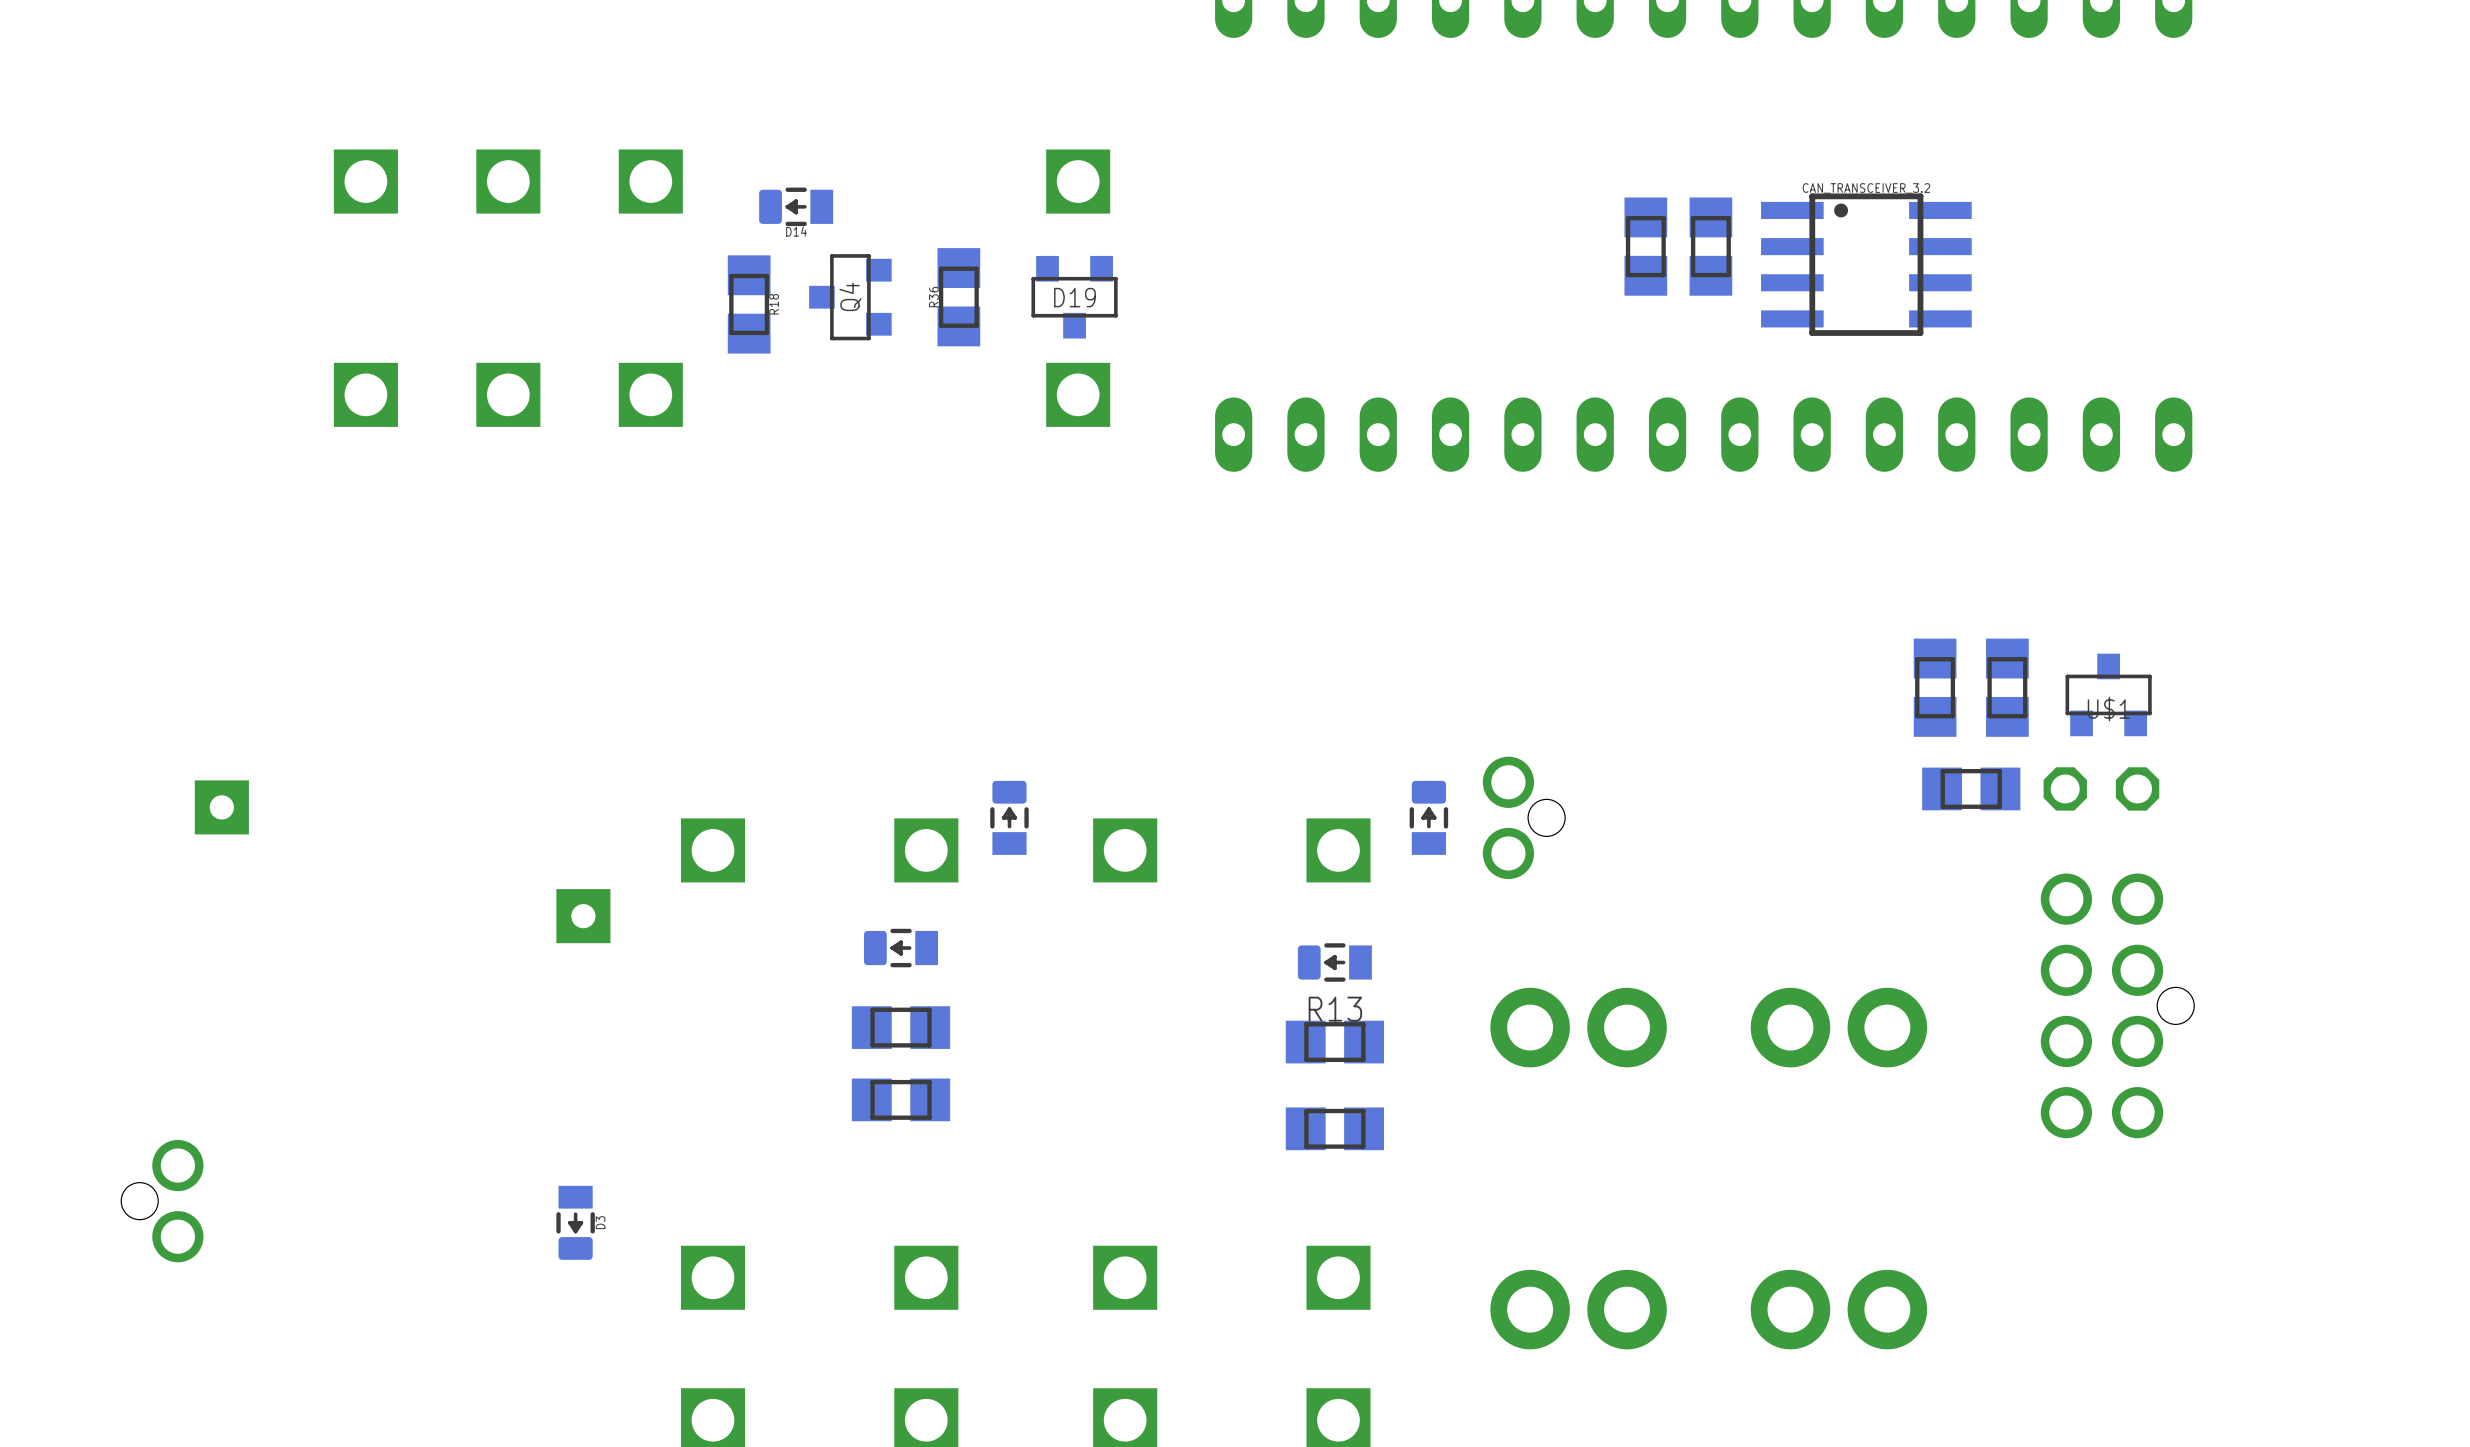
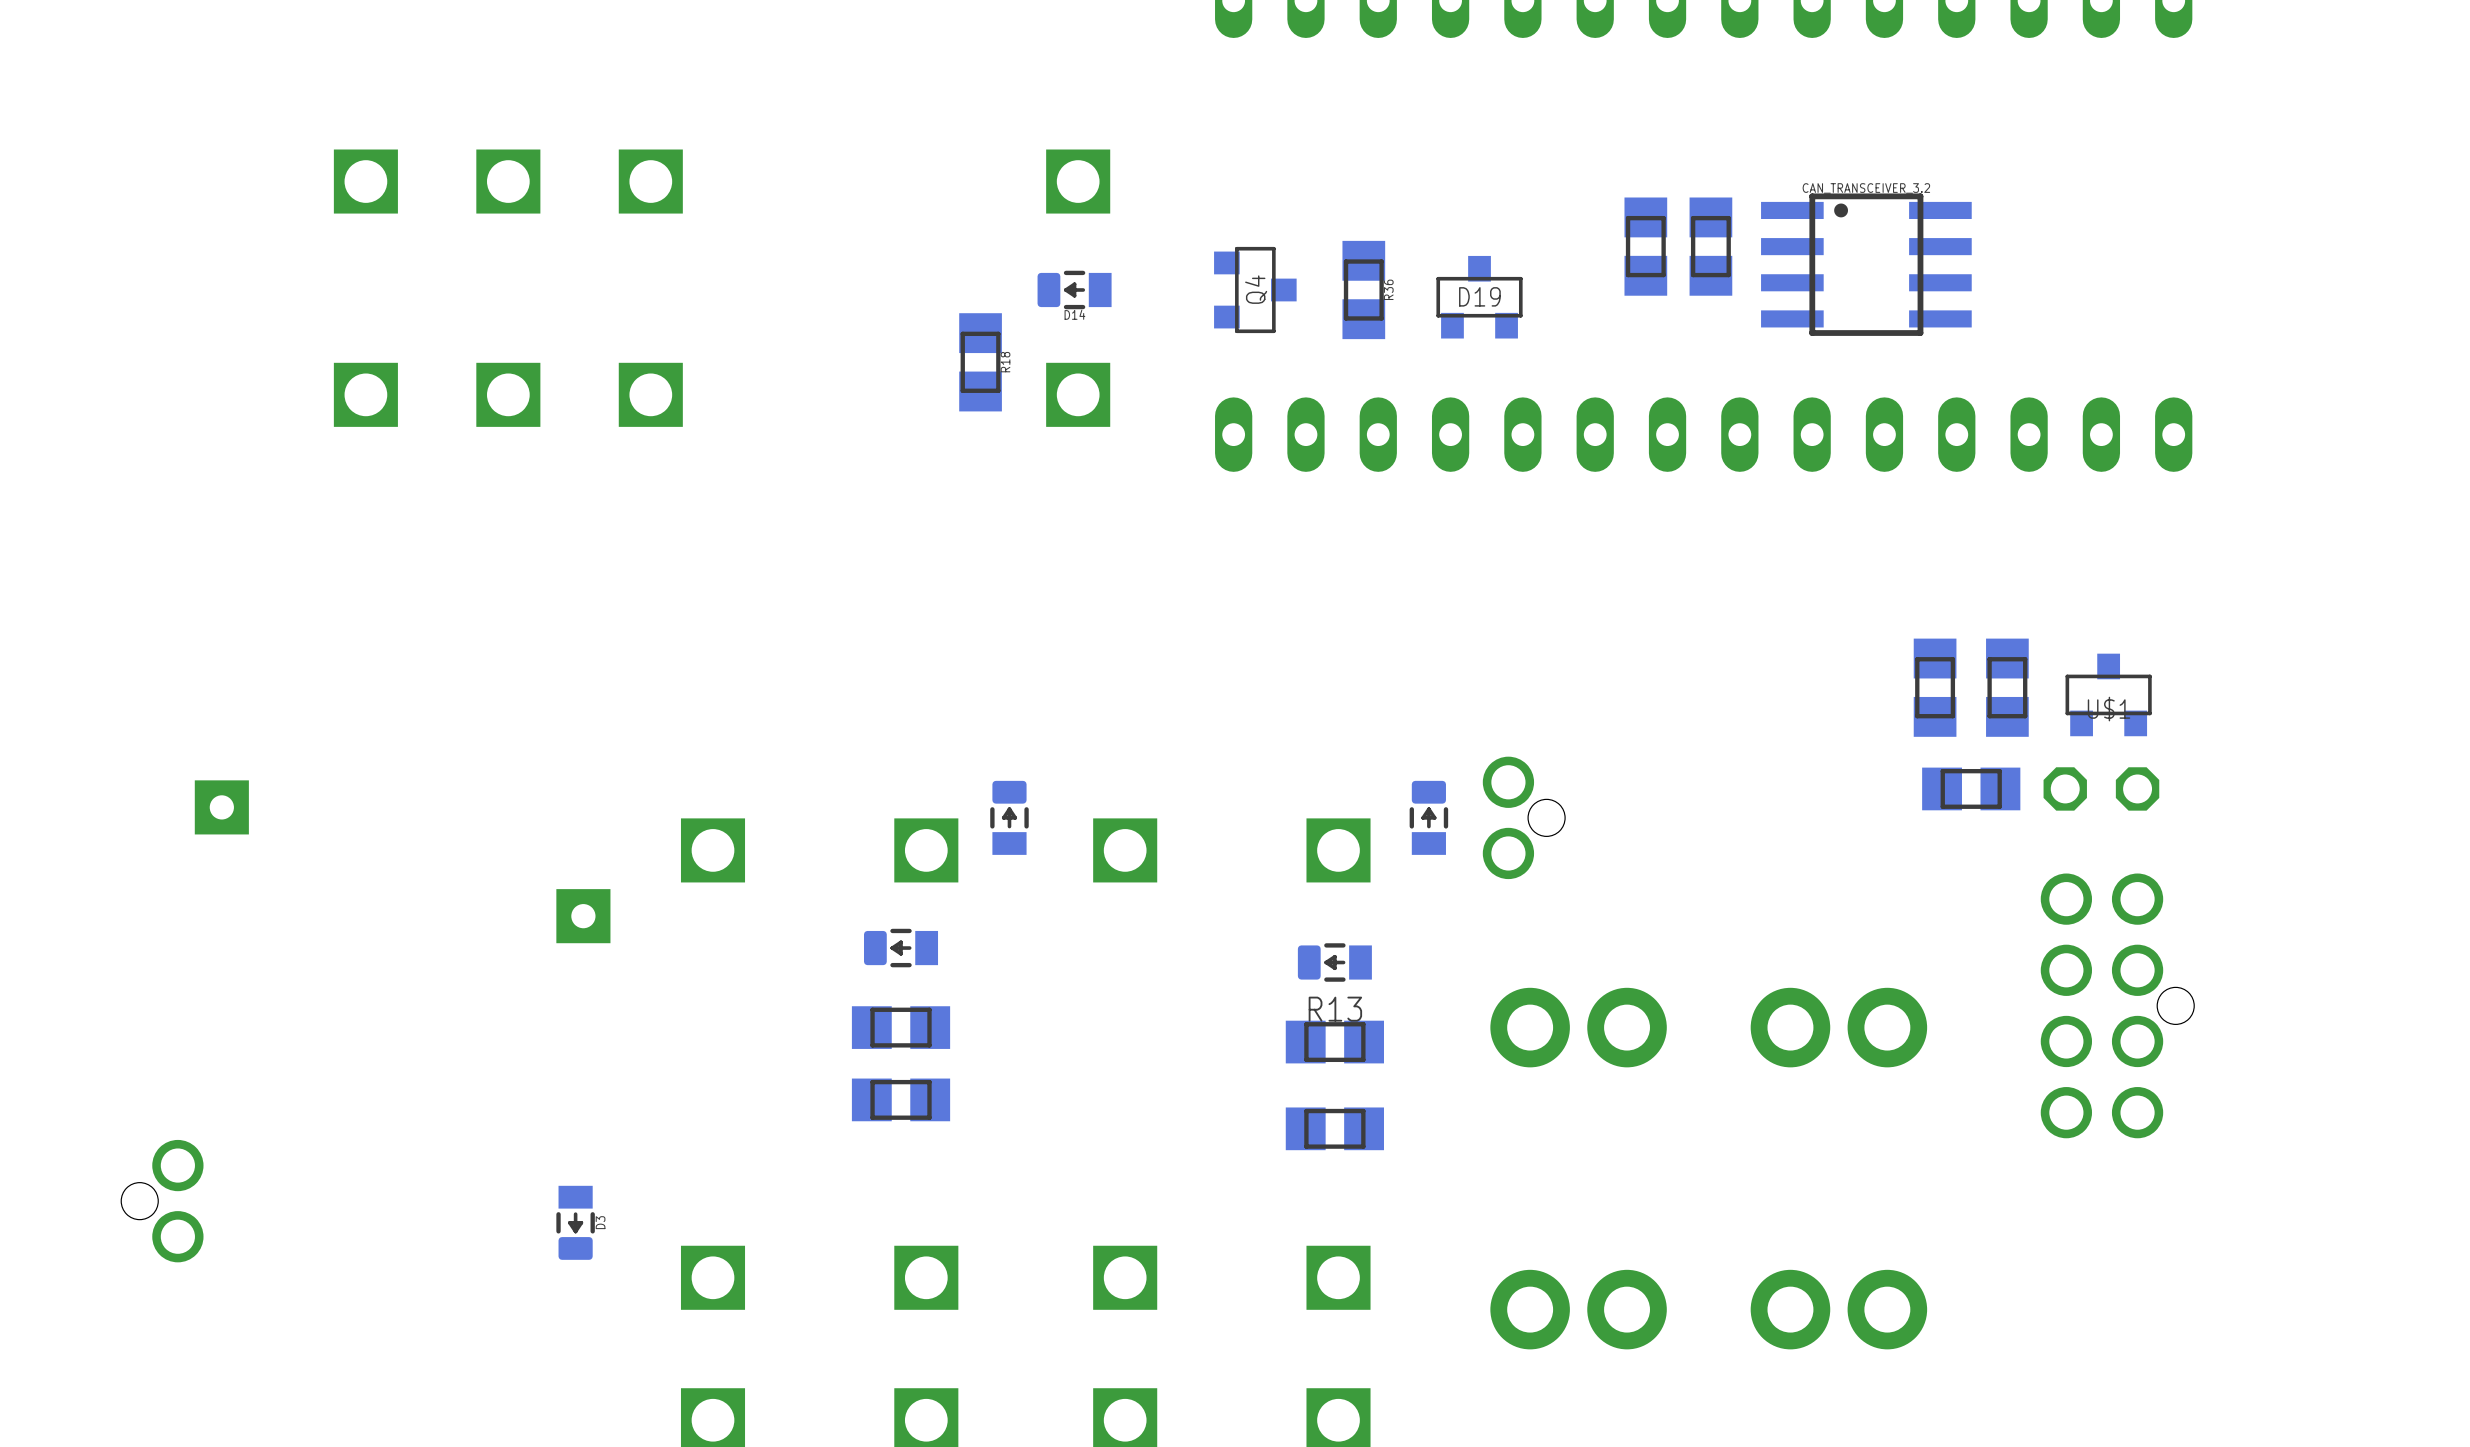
D14 position: (796, 206) -> (1074, 290)
Q4 rotation: 0° (850, 297) -> 180° (1255, 290)
Q4 position: (850, 297) -> (1255, 290)
R36 name position: R36 (933, 297) -> R36 (1388, 289)
R36 position: (958, 297) -> (1363, 290)
D19 rotation: 0° (1074, 297) -> 180° (1479, 297)
D19 position: (1074, 297) -> (1479, 297)
R18 position: (749, 304) -> (980, 362)

